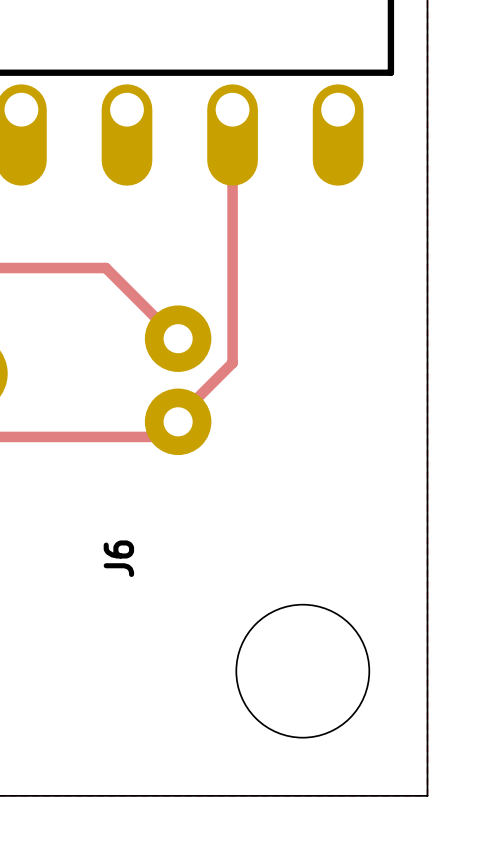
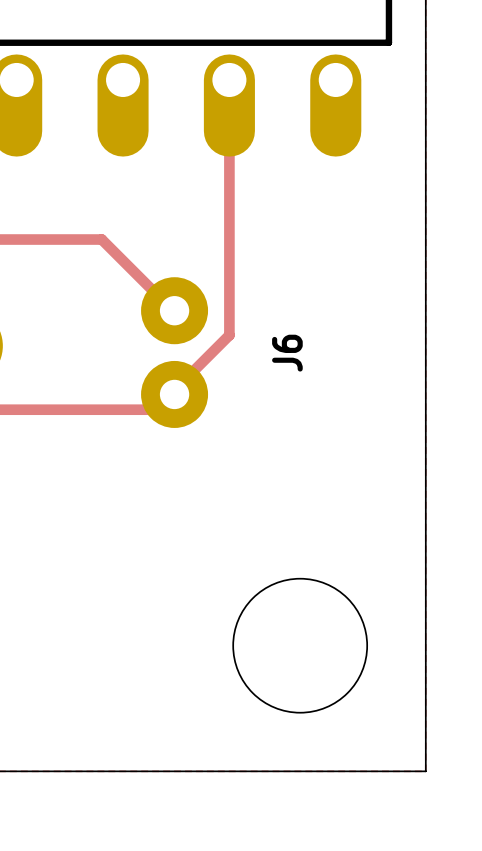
J6 name position: J6 (118, 558) -> J6 (287, 353)

